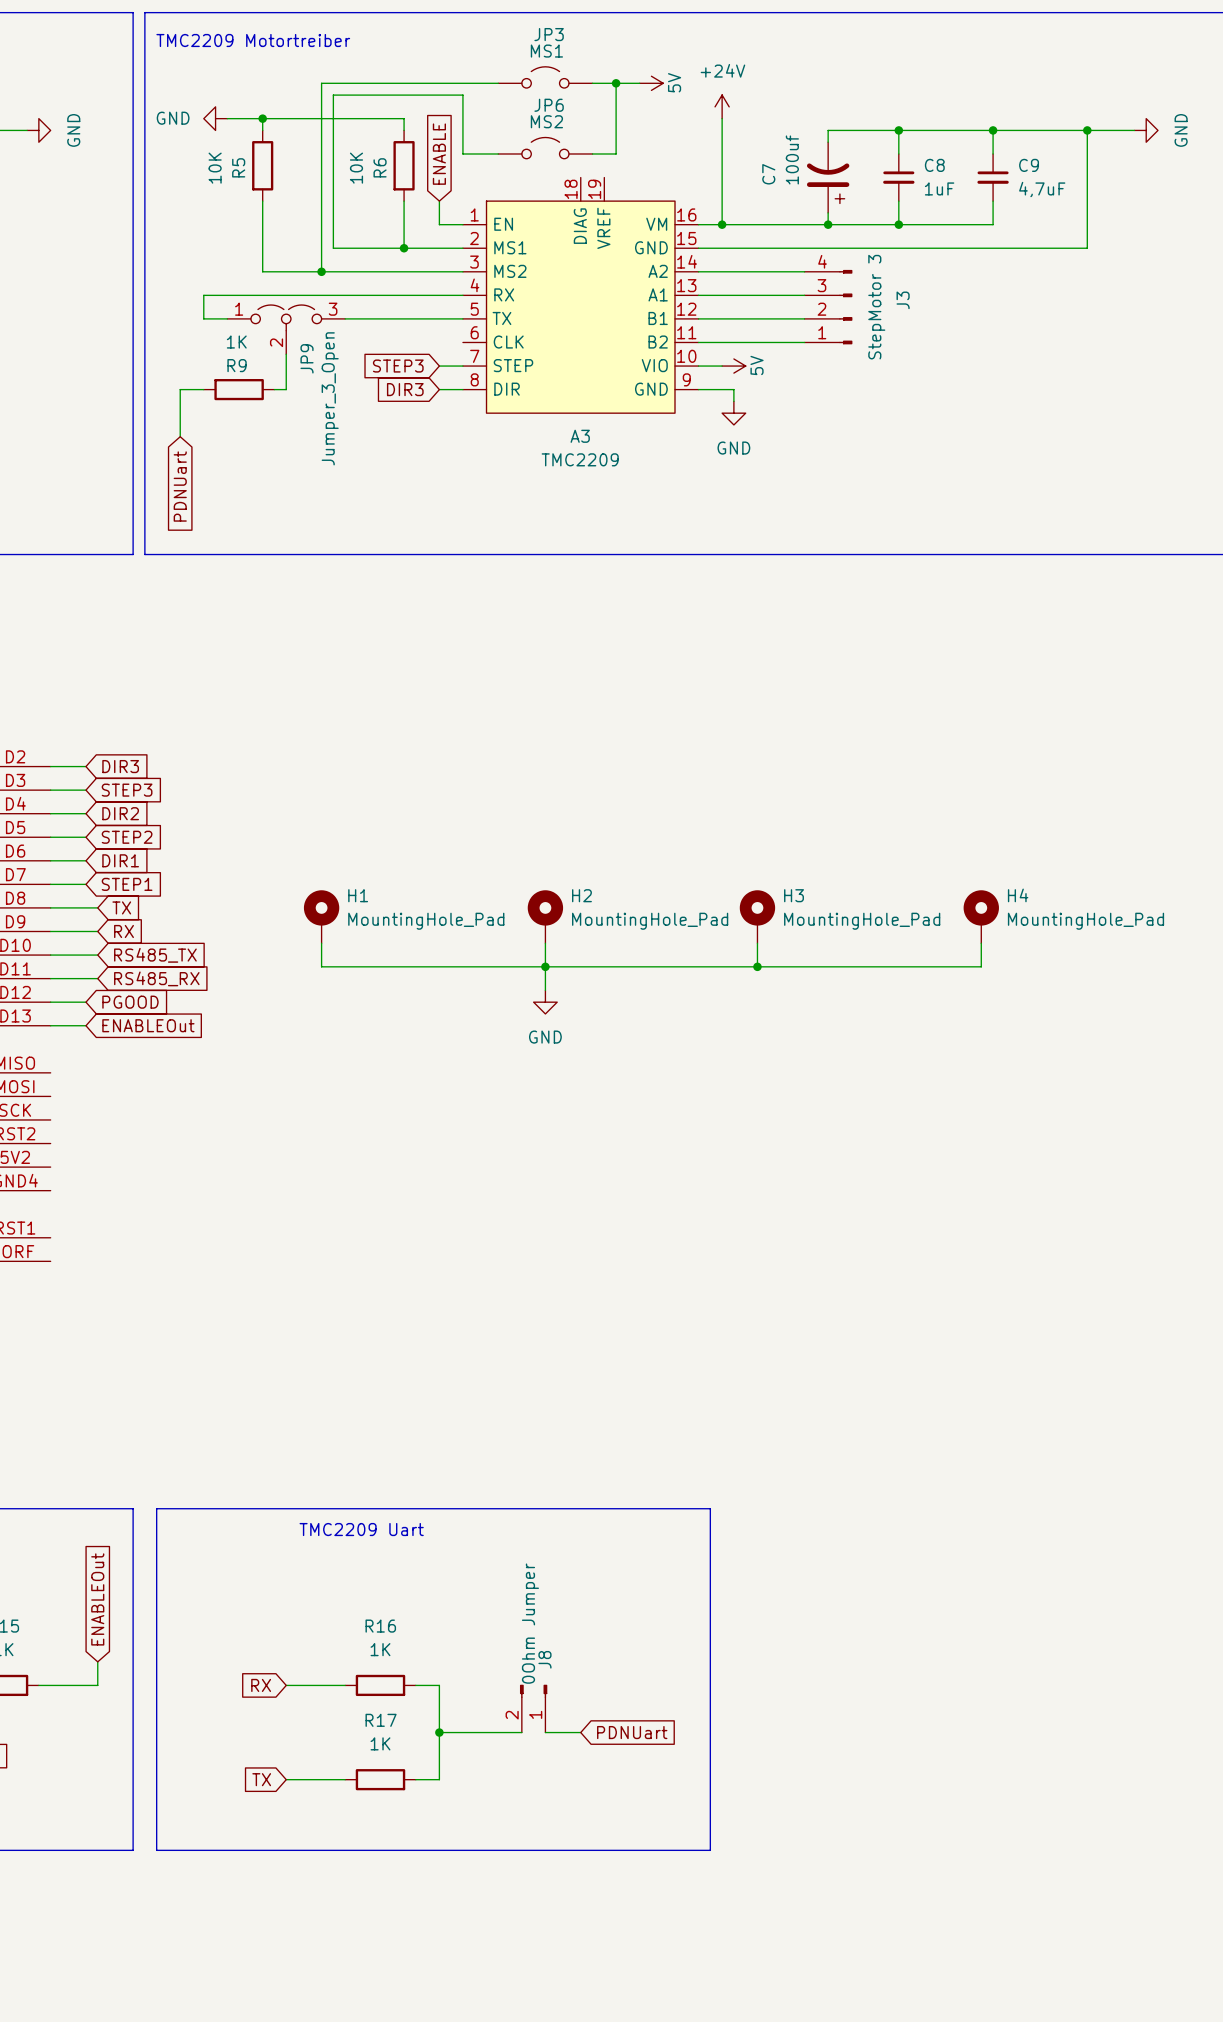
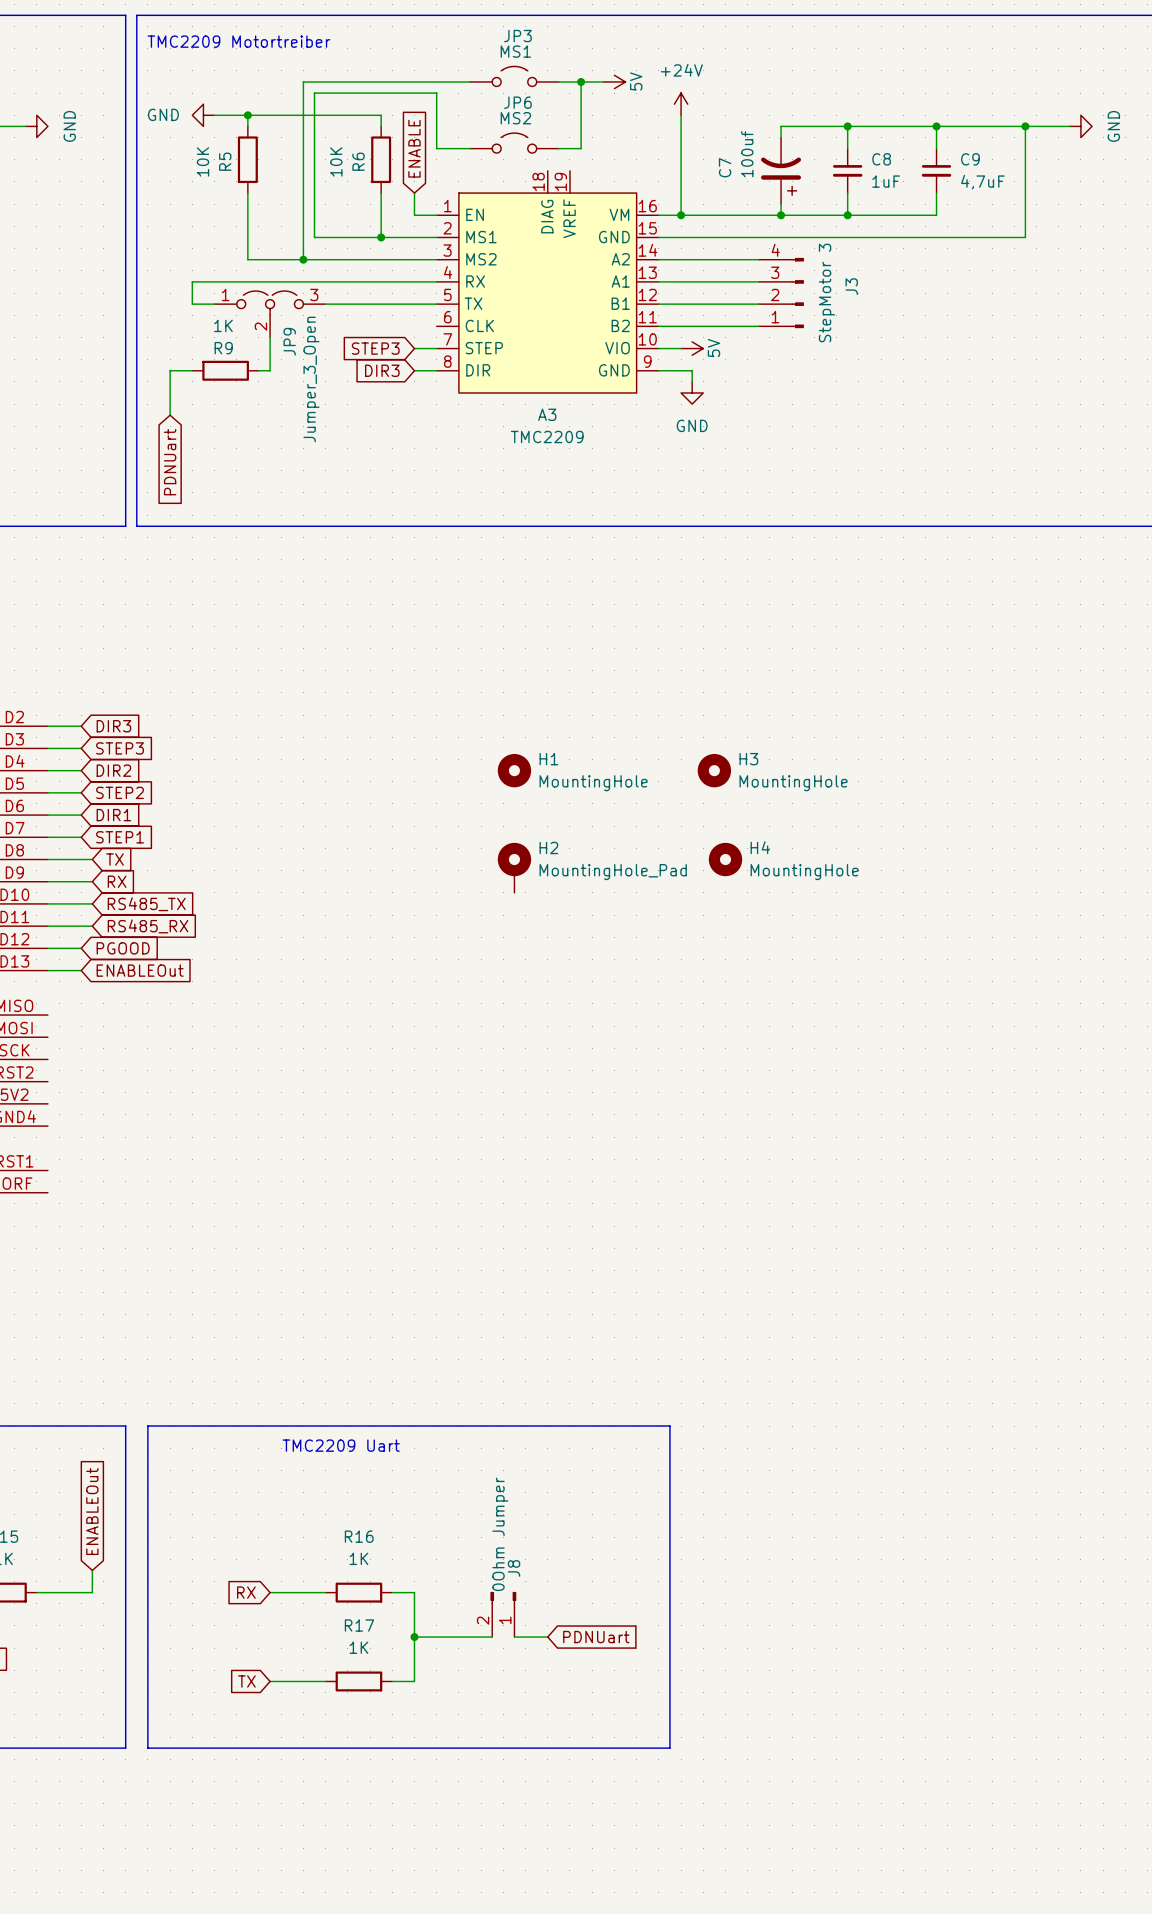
H1 symbol: [303, 890, 340, 944] -> [497, 753, 532, 788]
H3 symbol: [739, 890, 776, 944] -> [697, 753, 732, 788]
H4 symbol: [963, 890, 999, 944] -> [708, 842, 743, 877]
H1 value: MountingHole_Pad (426, 921) -> MountingHole (593, 783)
H3 value: MountingHole_Pad (862, 921) -> MountingHole (793, 783)
H4 value: MountingHole_Pad (1085, 921) -> MountingHole (804, 872)
wire: (321, 943) (321, 966) (981, 966) (981, 943) -> none
wire: (545, 943) (545, 990) -> none
wire: (757, 943) (757, 966) -> none
junction: (545, 966) -> none
junction: (757, 966) -> none
power symbol: GND (545, 1002) -> none

